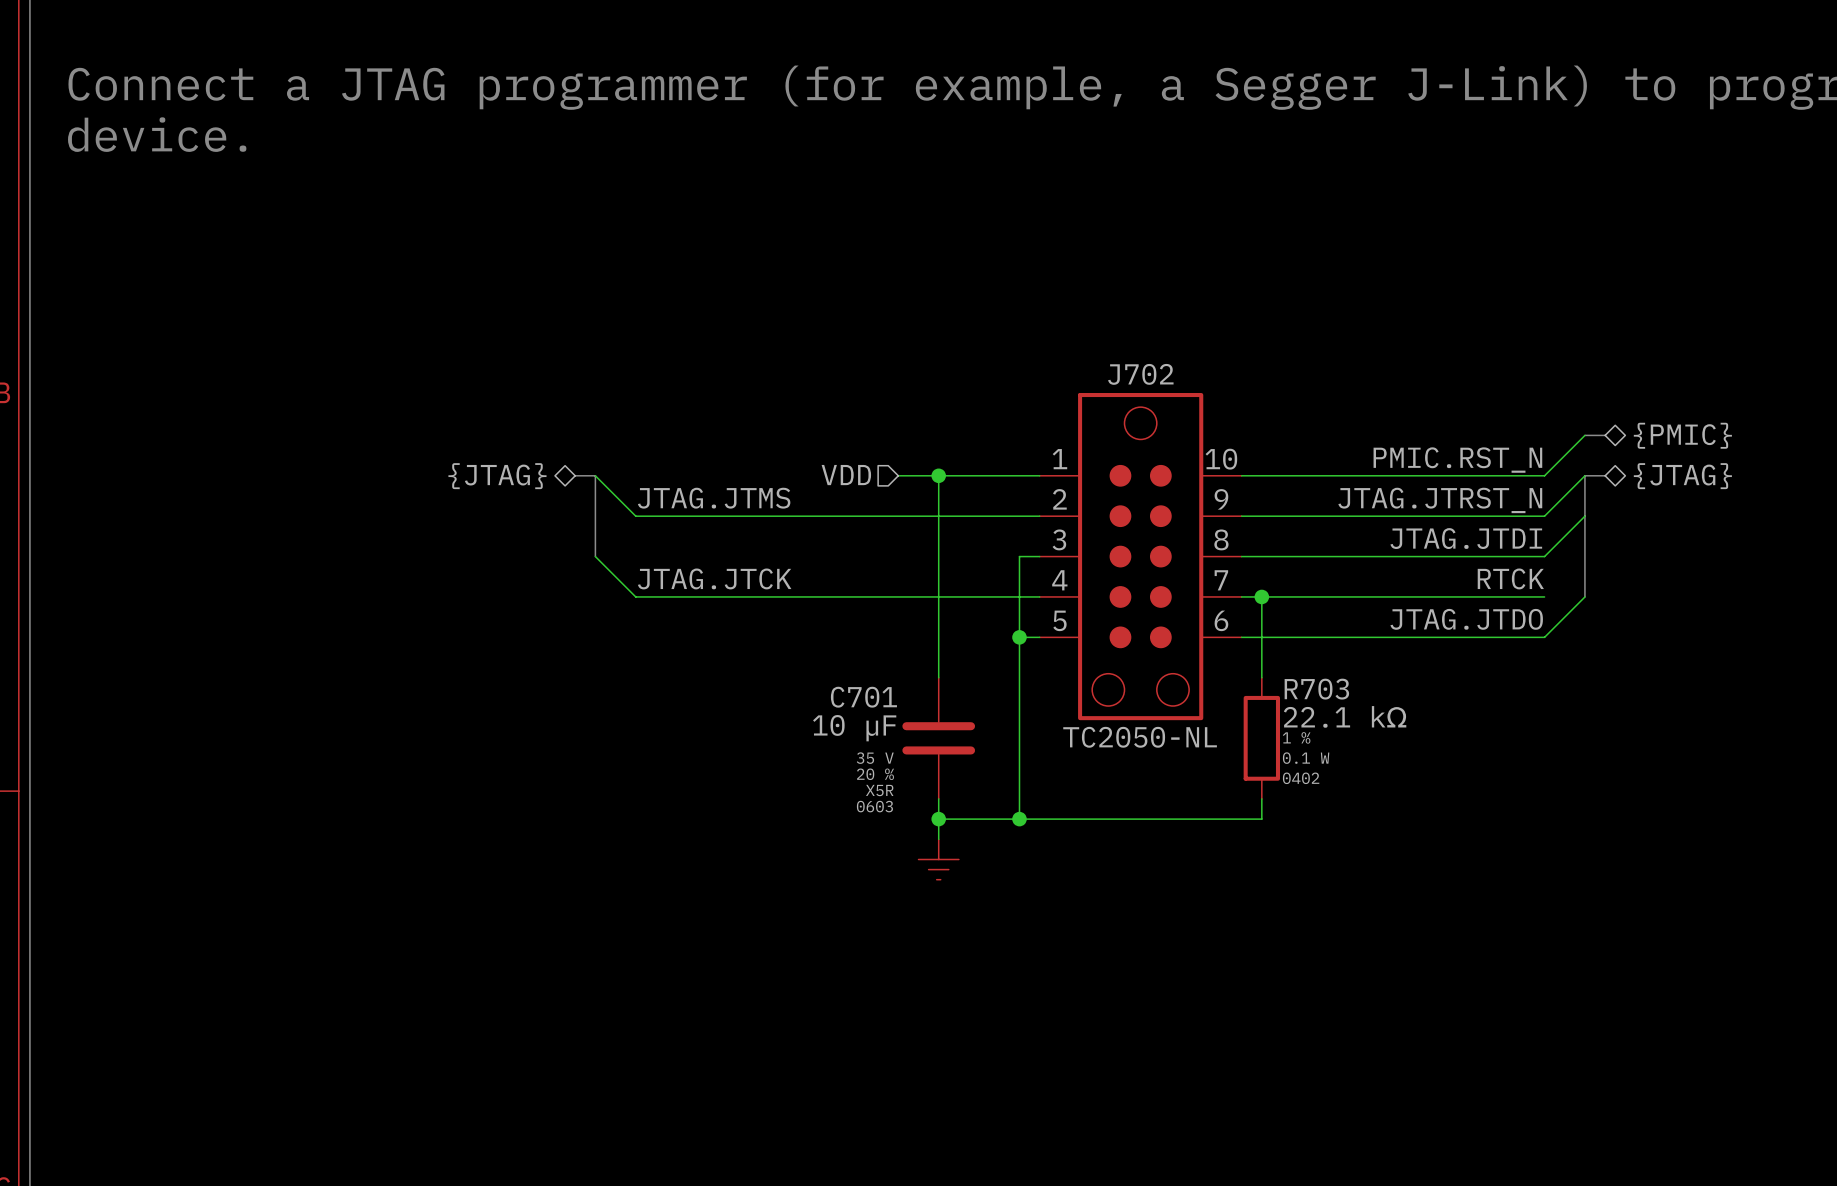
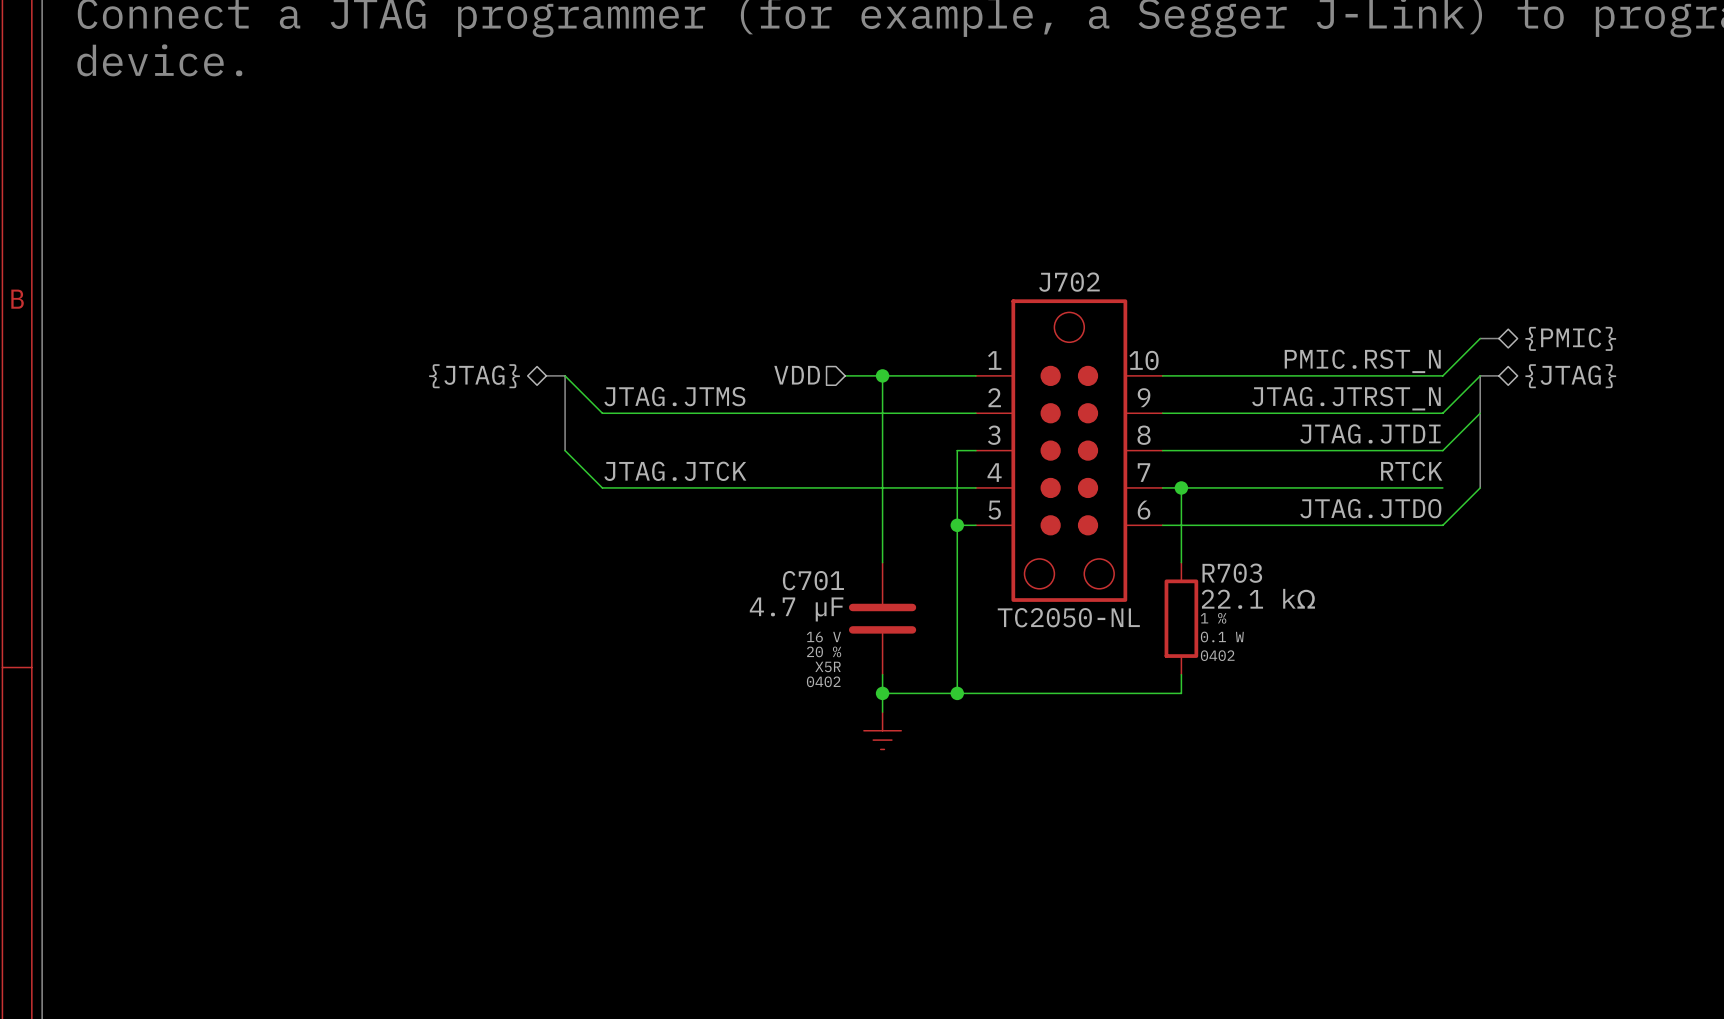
C701 value: 10 µF (854, 728) -> 4.7 µF (796, 609)
C701 text: 35 V (875, 758) -> 16 V (823, 637)
C701 text: 0603 (874, 806) -> 0402 (823, 681)

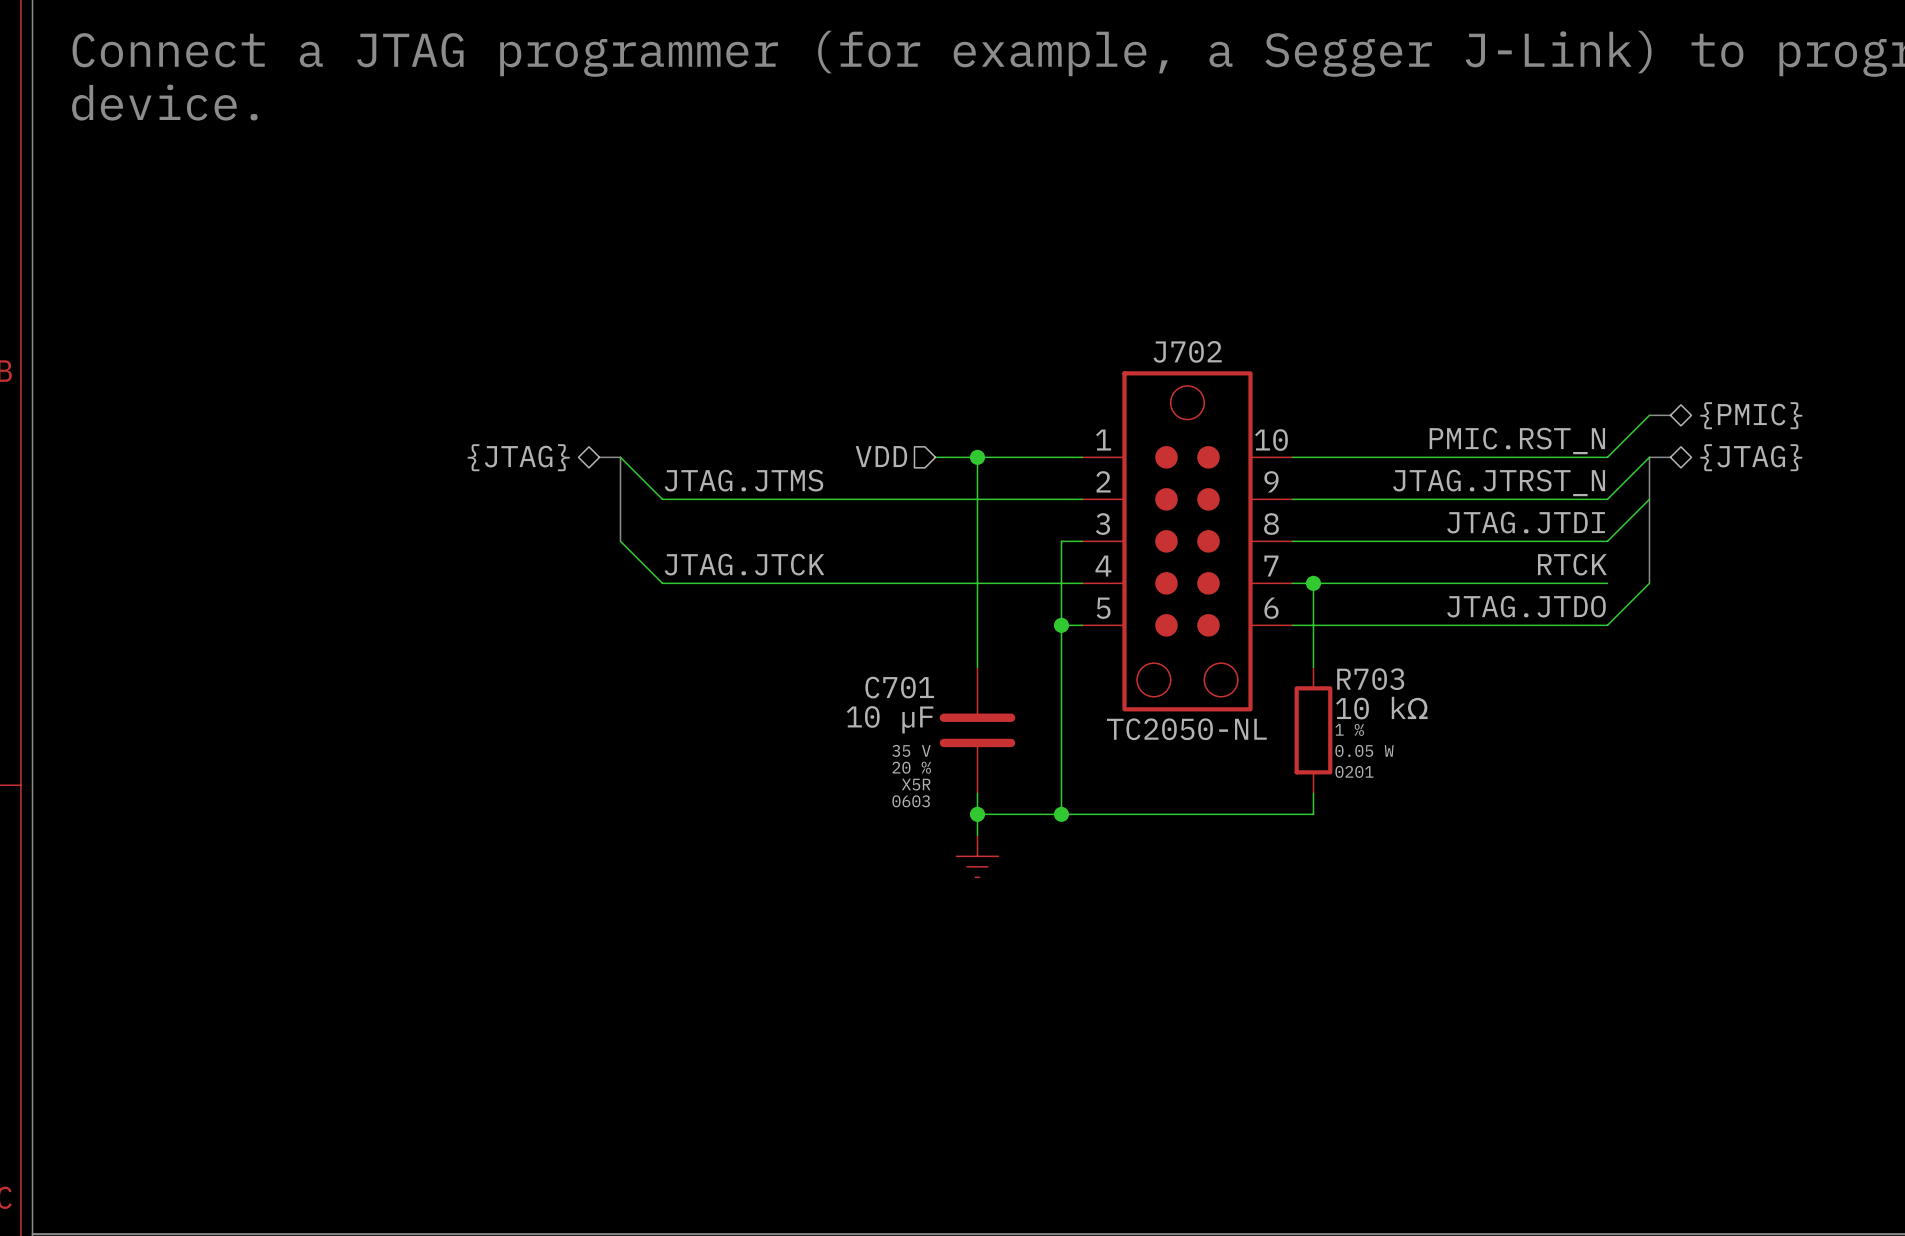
R703 value: 22.1 kΩ (1258, 598) -> 10 kΩ (1381, 708)
C701 value: 4.7 µF (796, 609) -> 10 µF (890, 719)
R703 text: 0.1 W (1222, 636) -> 0.05 W (1364, 750)
C701 text: 16 V (823, 637) -> 35 V (911, 750)
R703 text: 0402 (1217, 655) -> 0201 (1354, 771)
C701 text: 0402 (823, 681) -> 0603 (911, 801)

